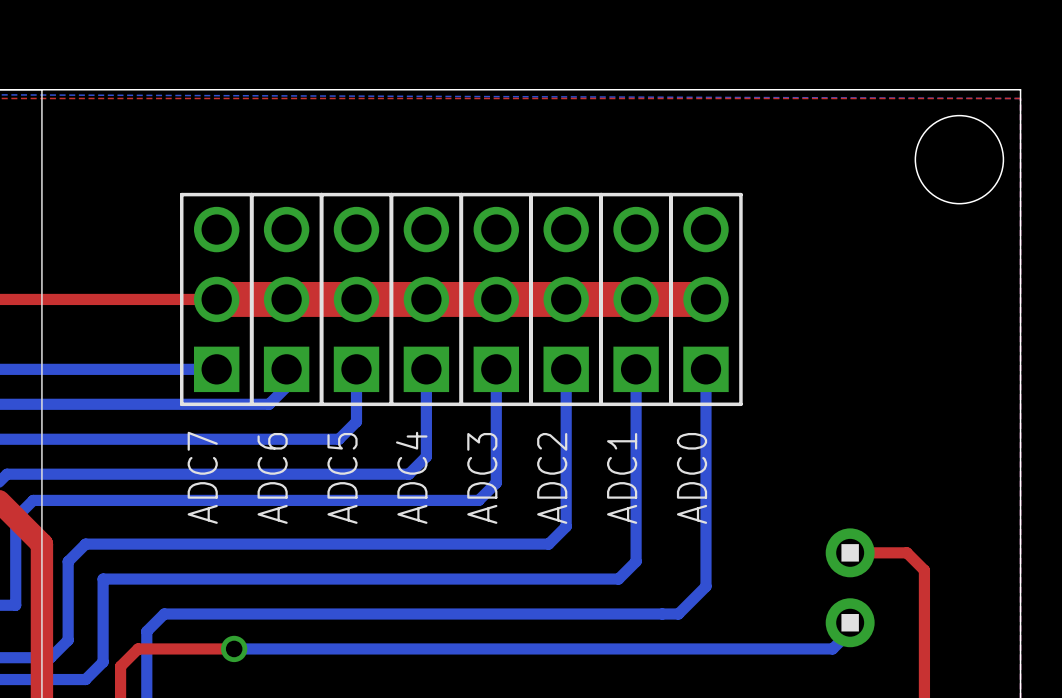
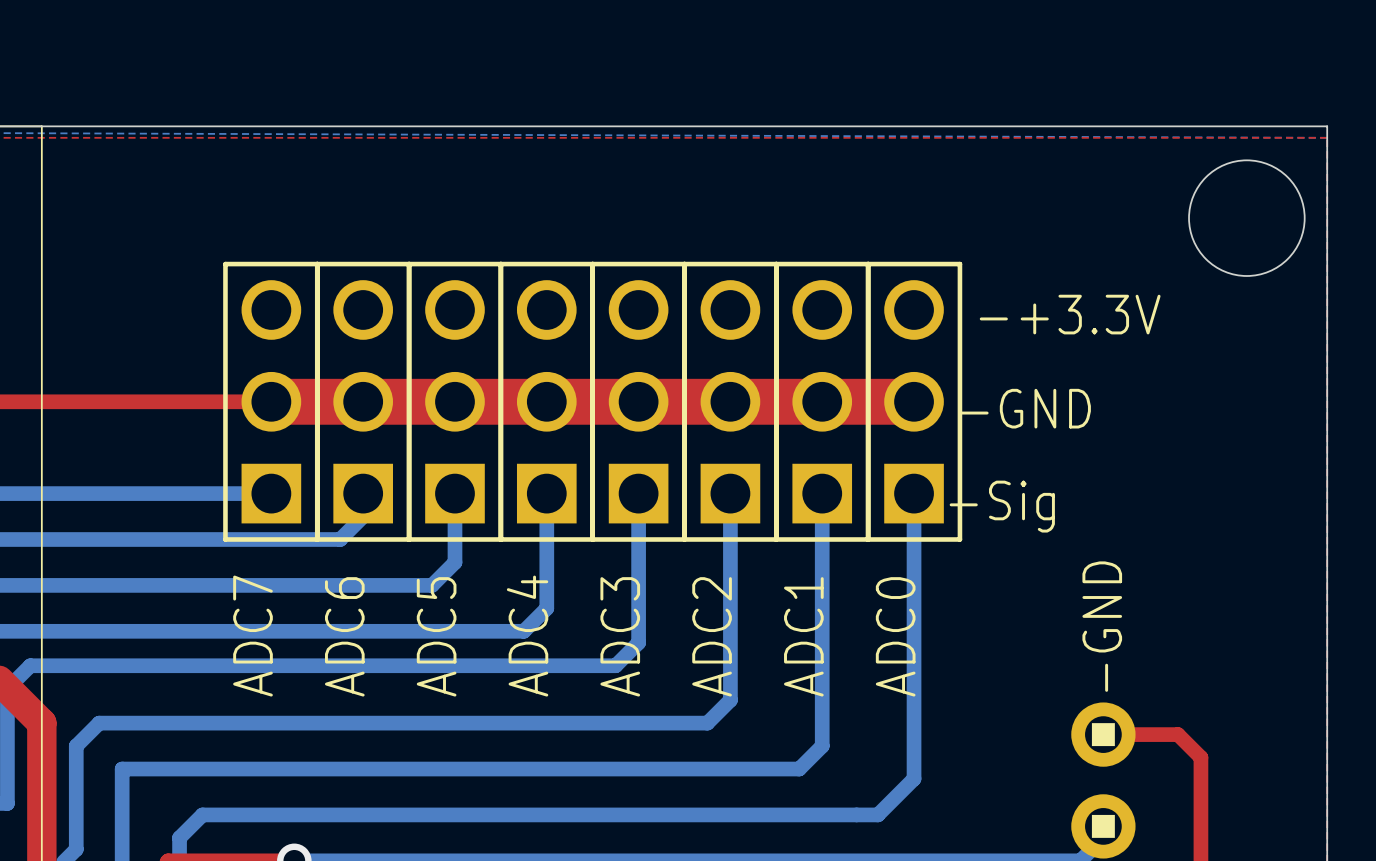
text: none -> -+3.3V (1070, 314)
text: none -> -GND (1025, 408)
text: none -> -Sig (1002, 506)
text: none -> -GND (1102, 626)

